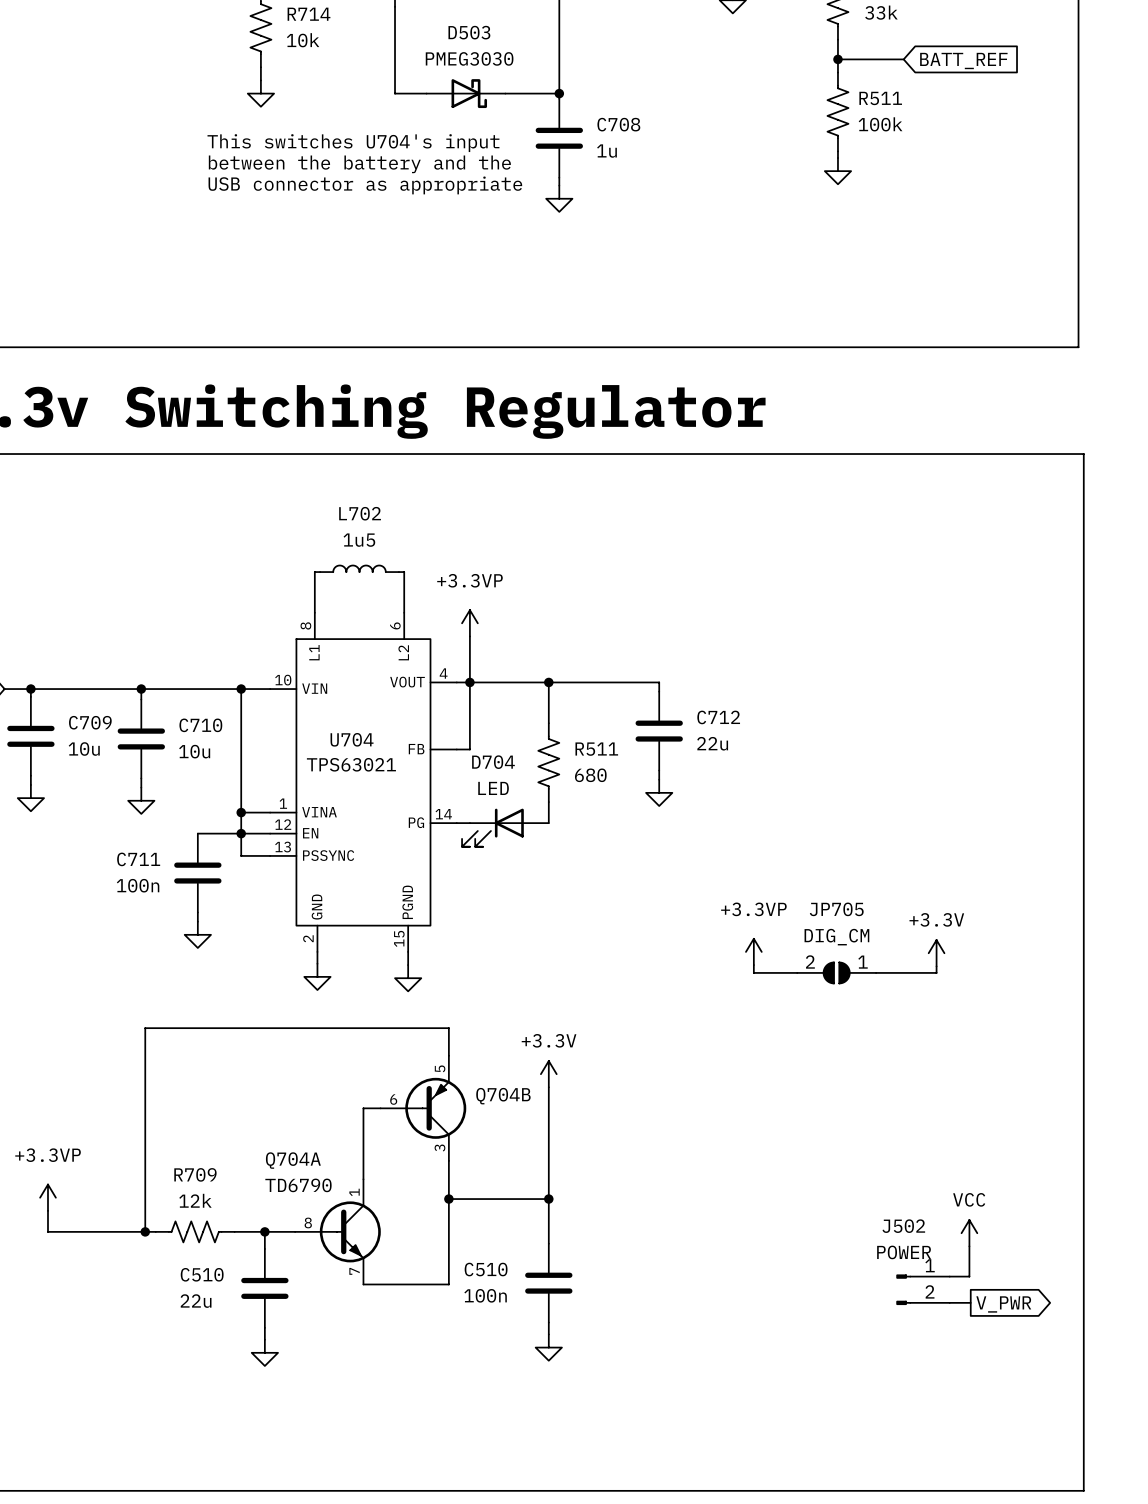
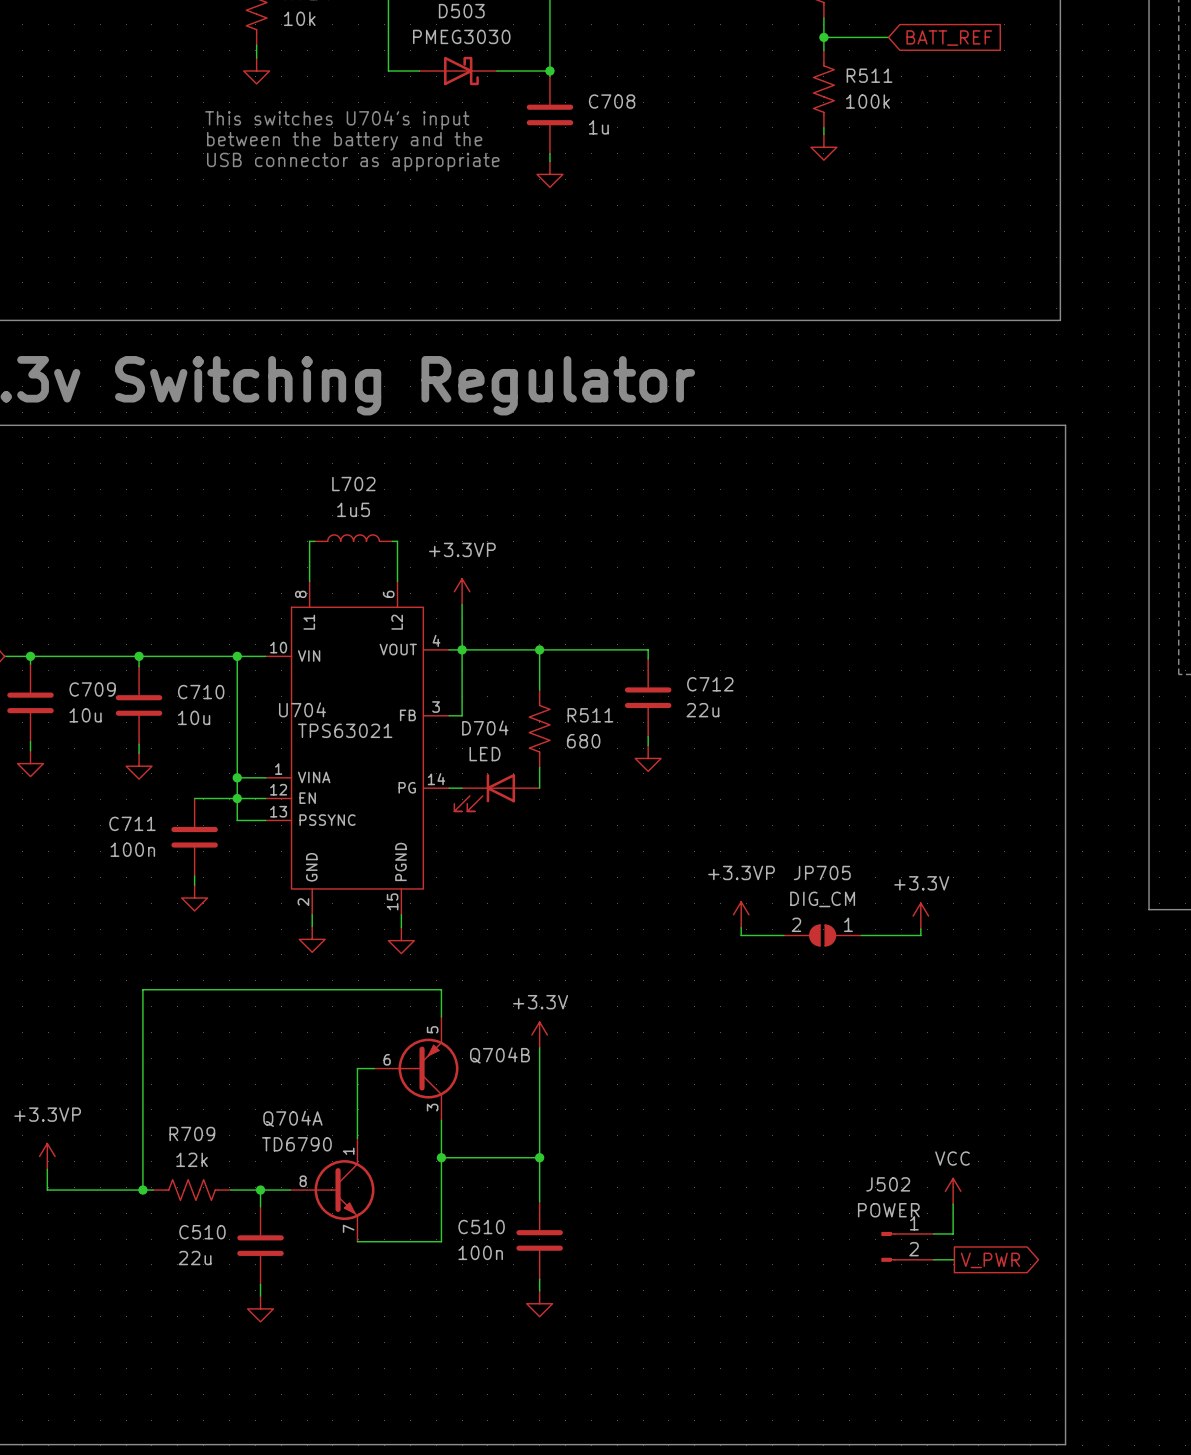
U704 name position: U704 (352, 739) -> U704 (302, 709)
U704 pin number: none -> 3 (436, 707)

